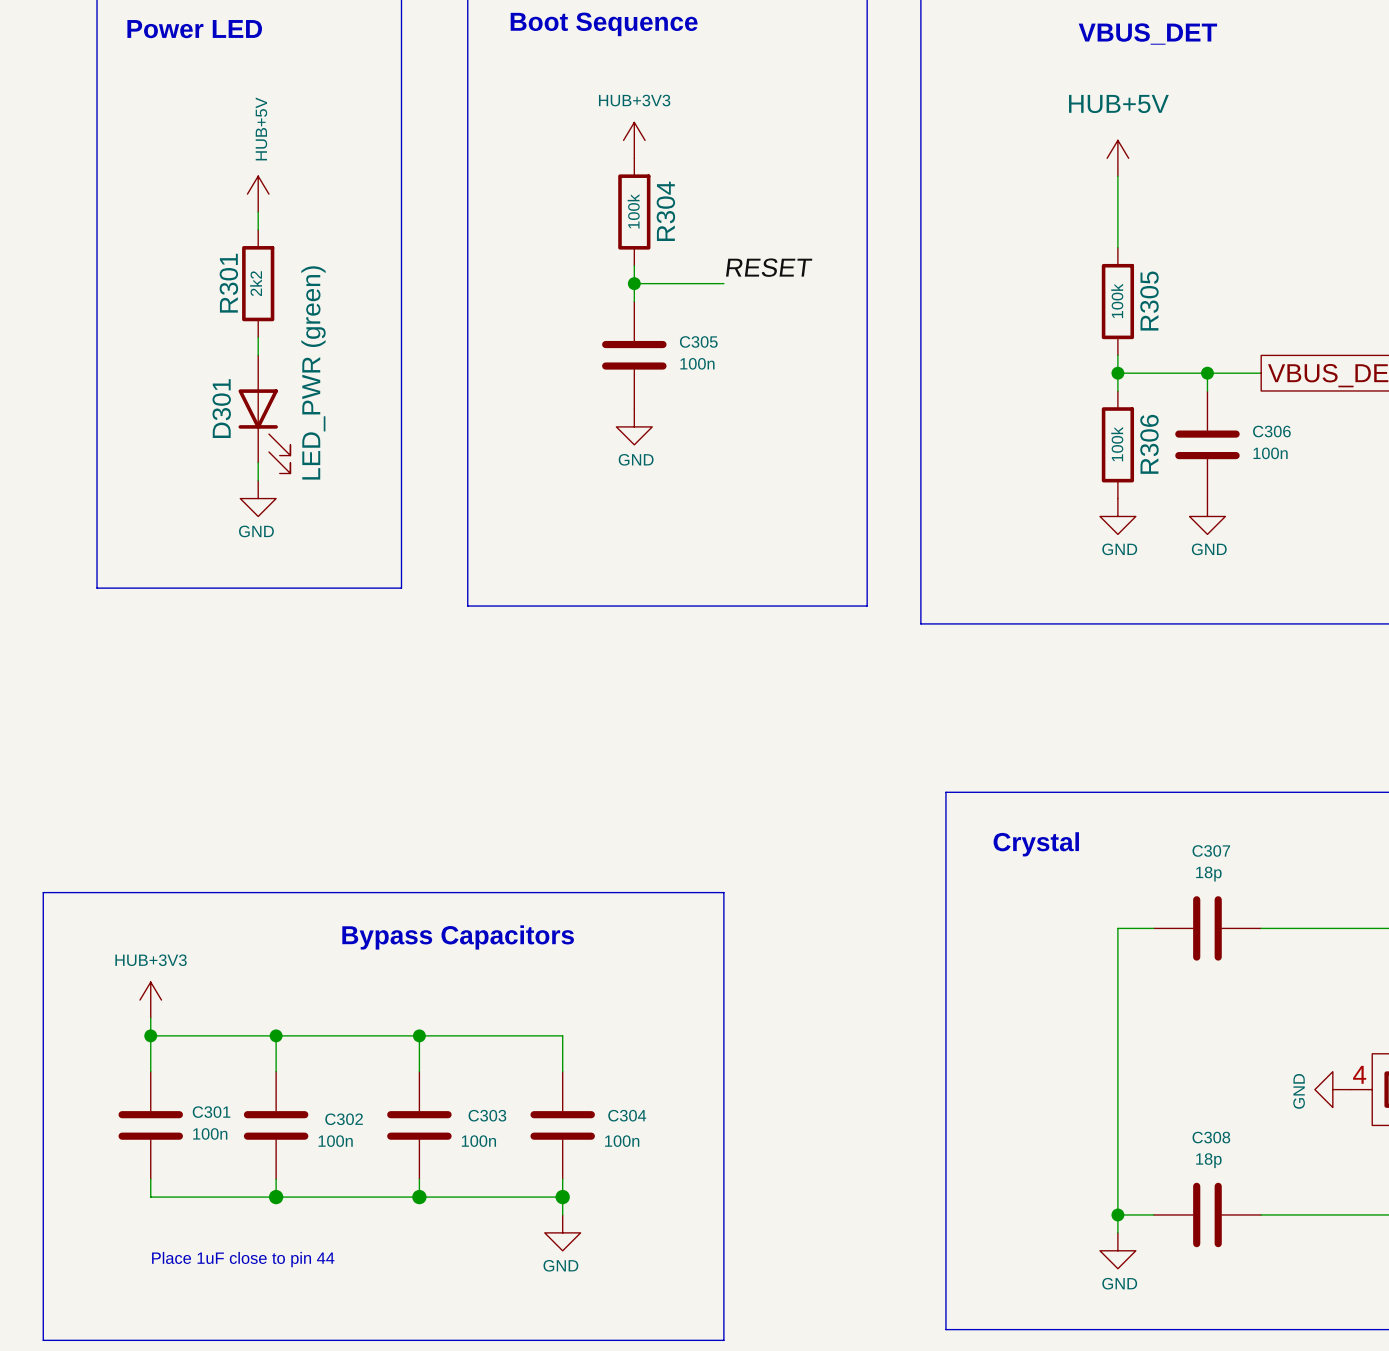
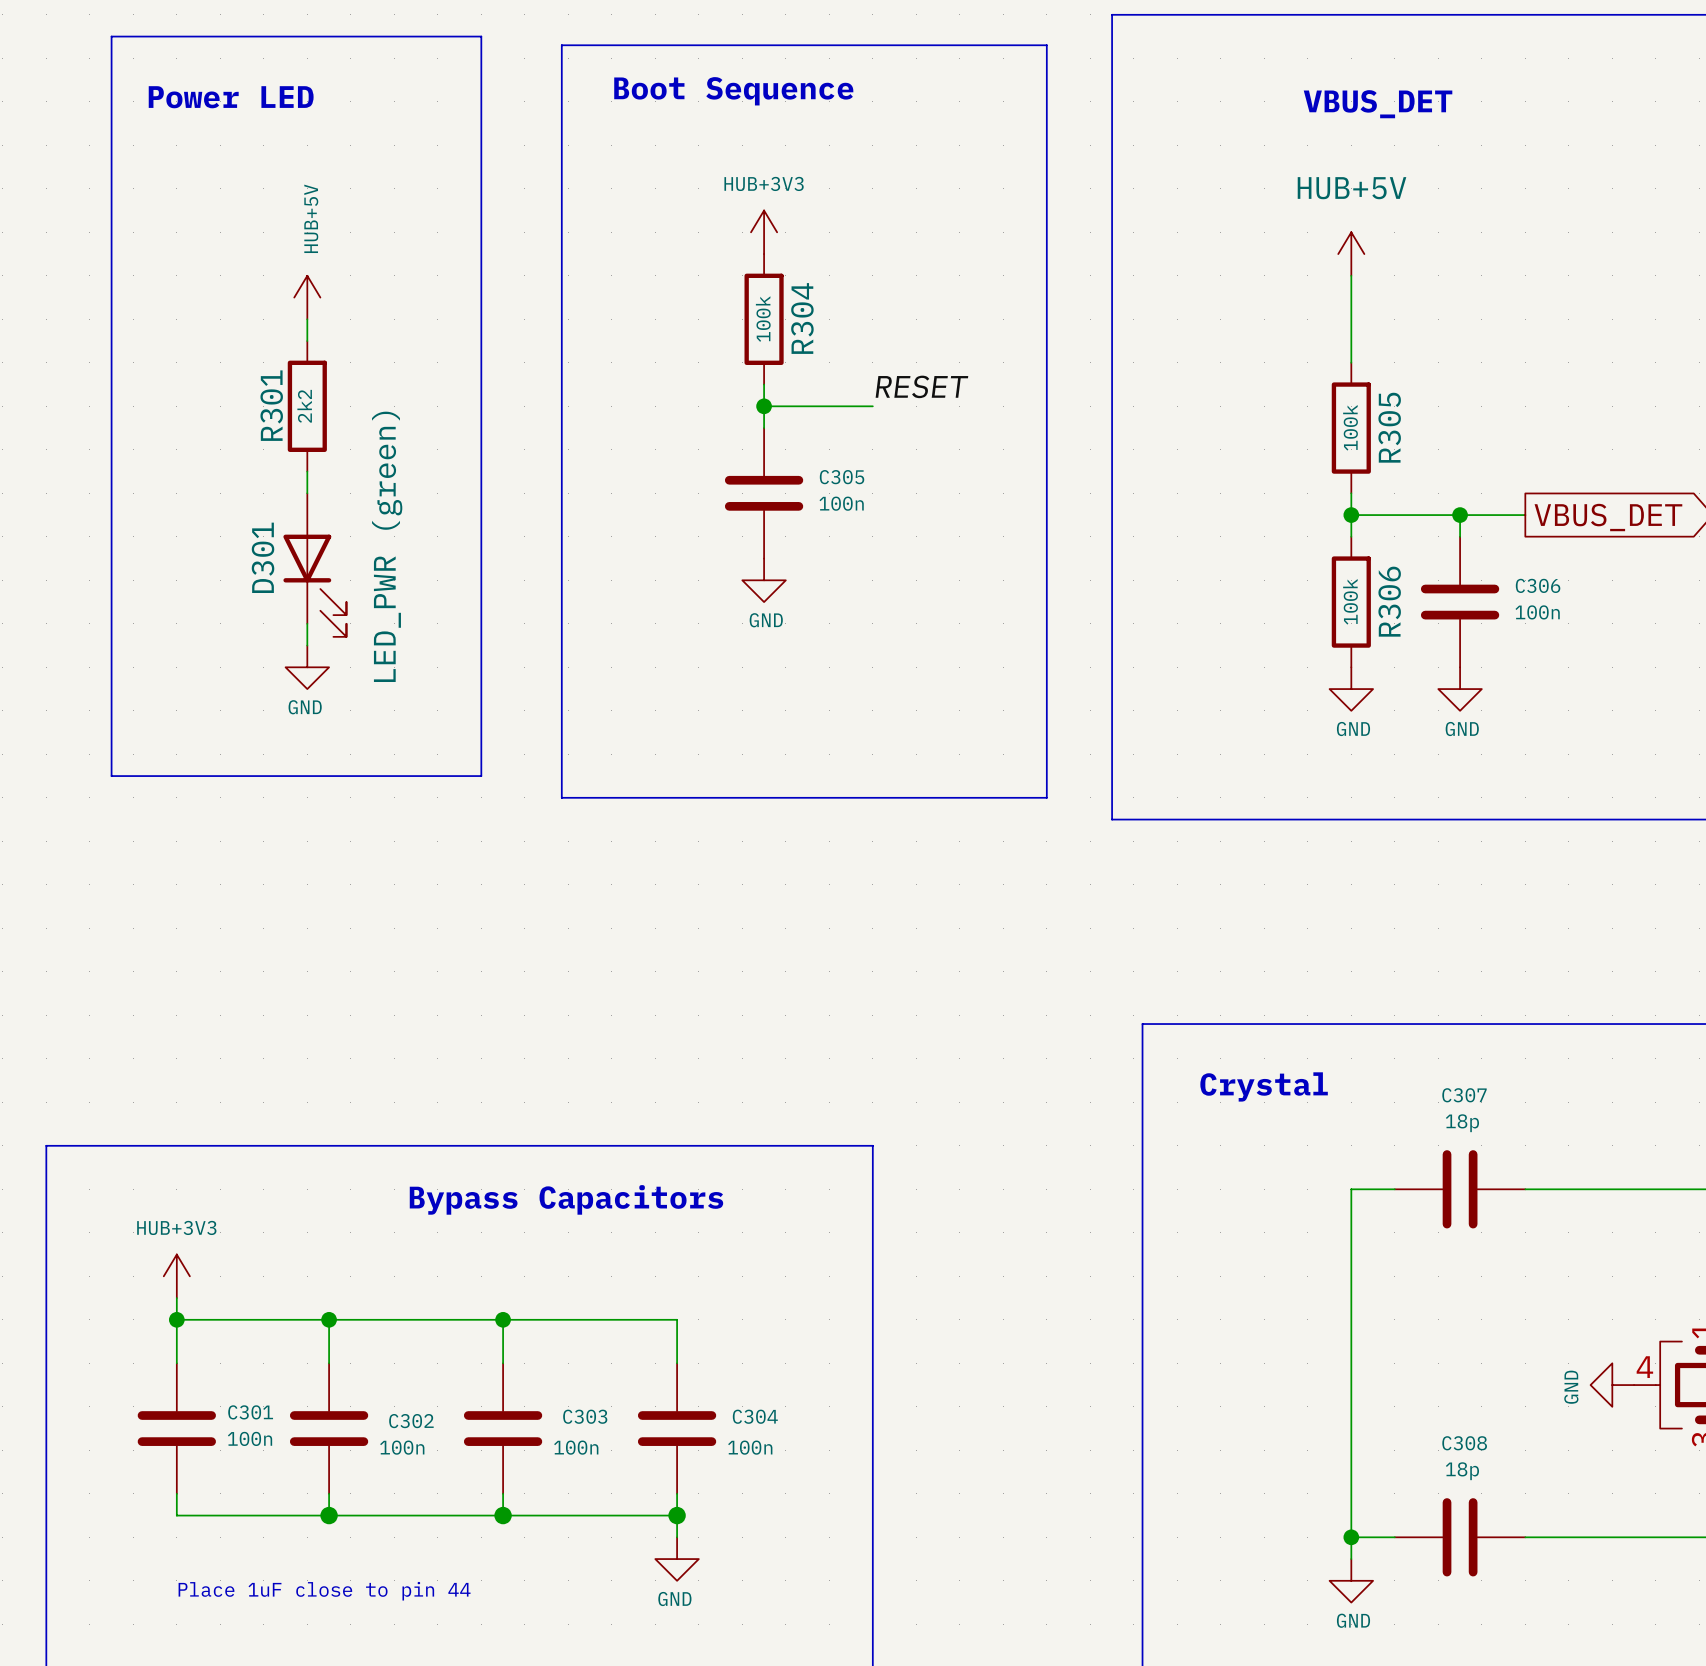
D301 text: LED_PWR (green) (313, 372) -> none
D301 value: none -> LED_PWR (green) (387, 546)

